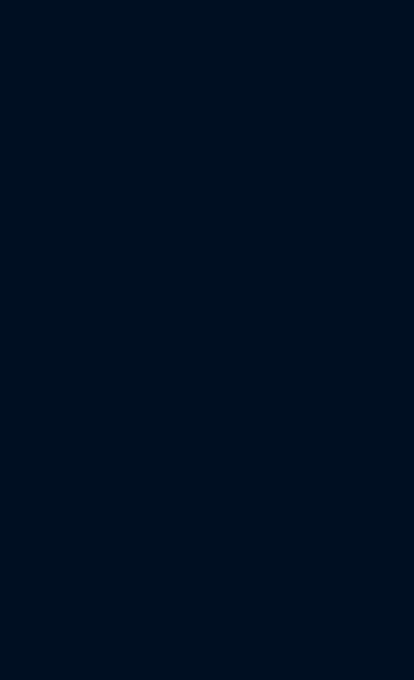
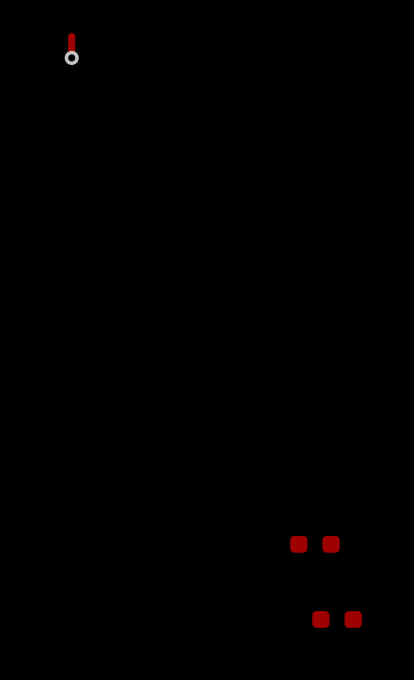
top track: none -> (71, 36) (71, 57)
via: none -> (71, 57)
part: none -> (314, 544)
part: none -> (337, 619)

